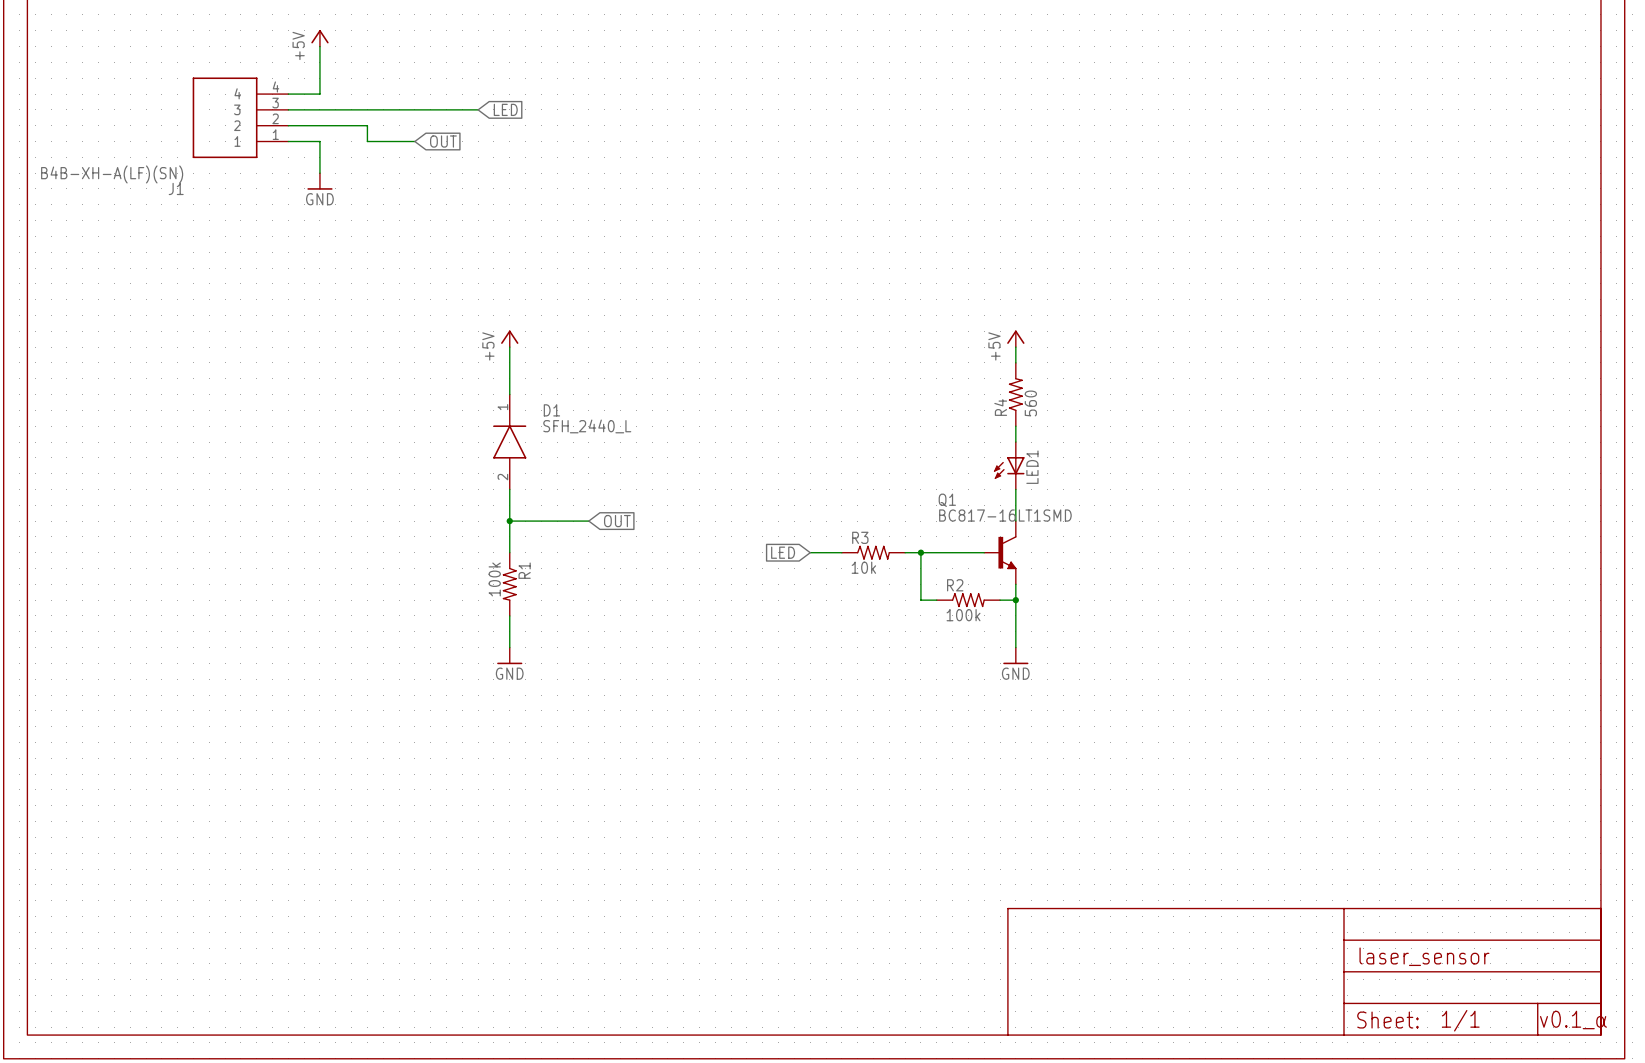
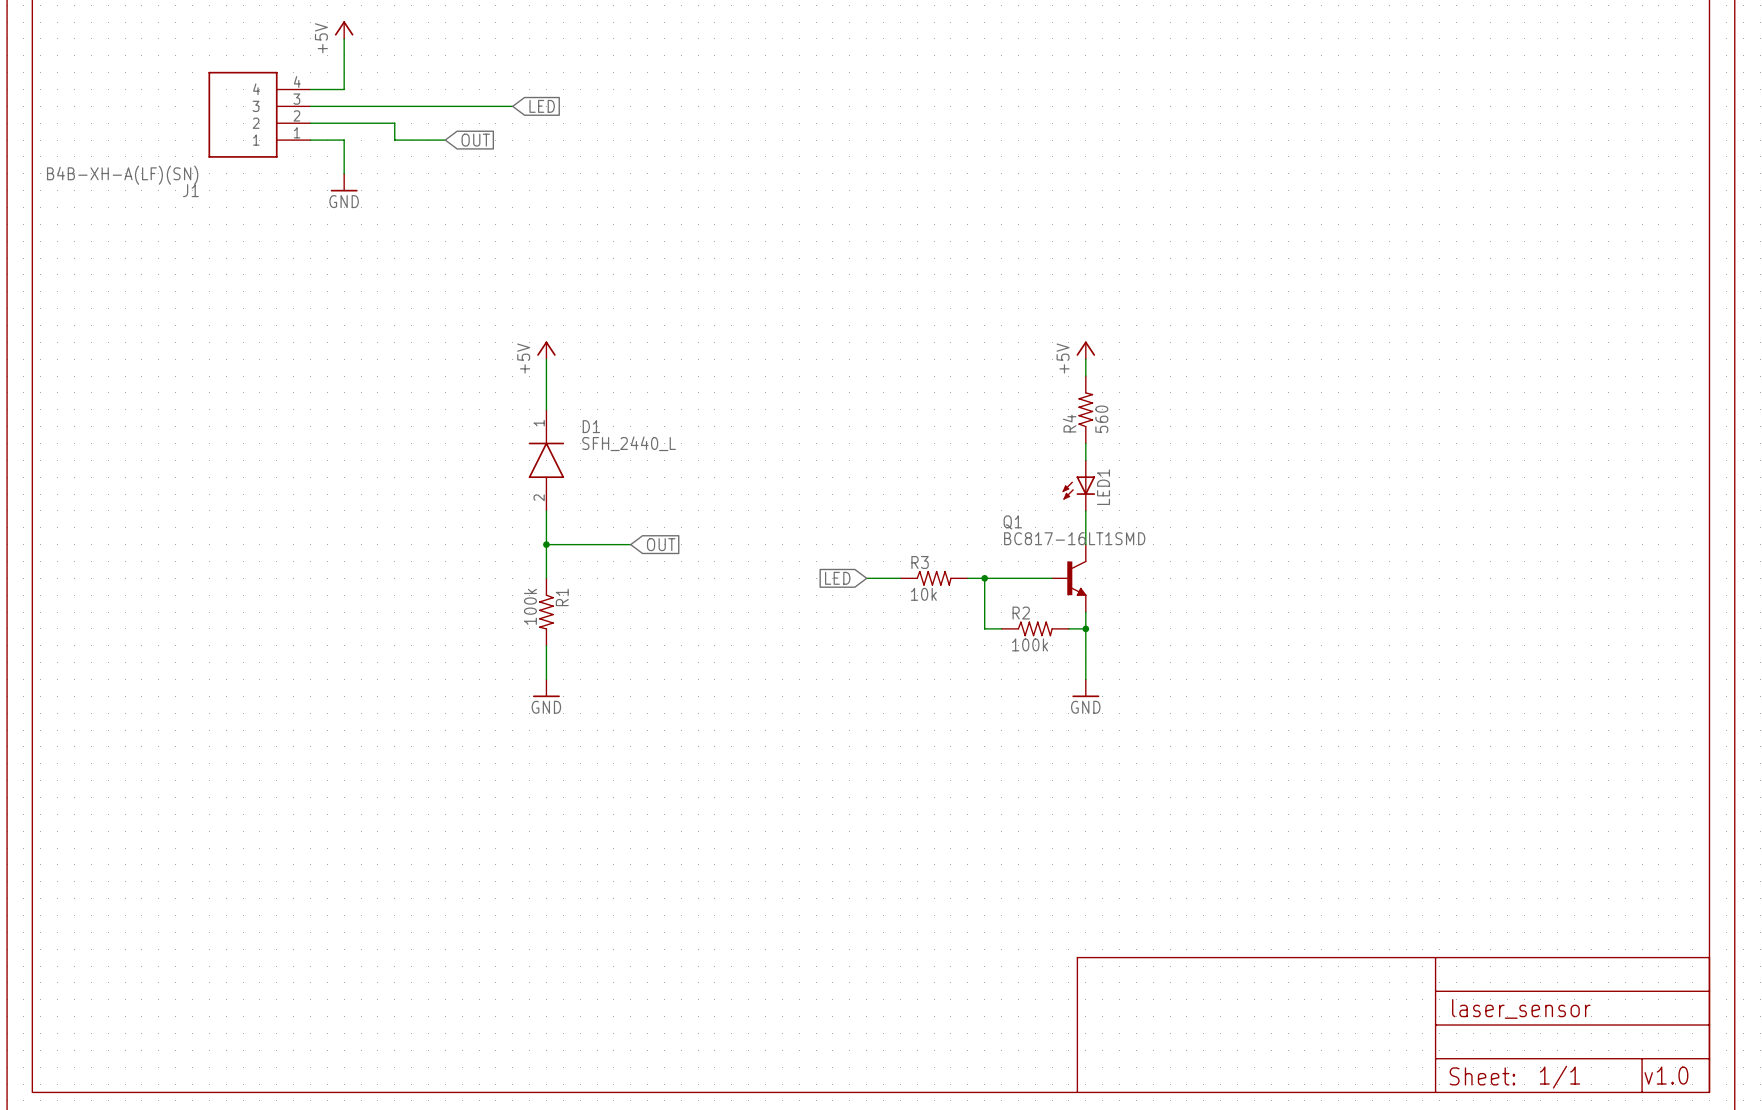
text: v0.1_α (1573, 1020) -> v1.0 (1666, 1075)

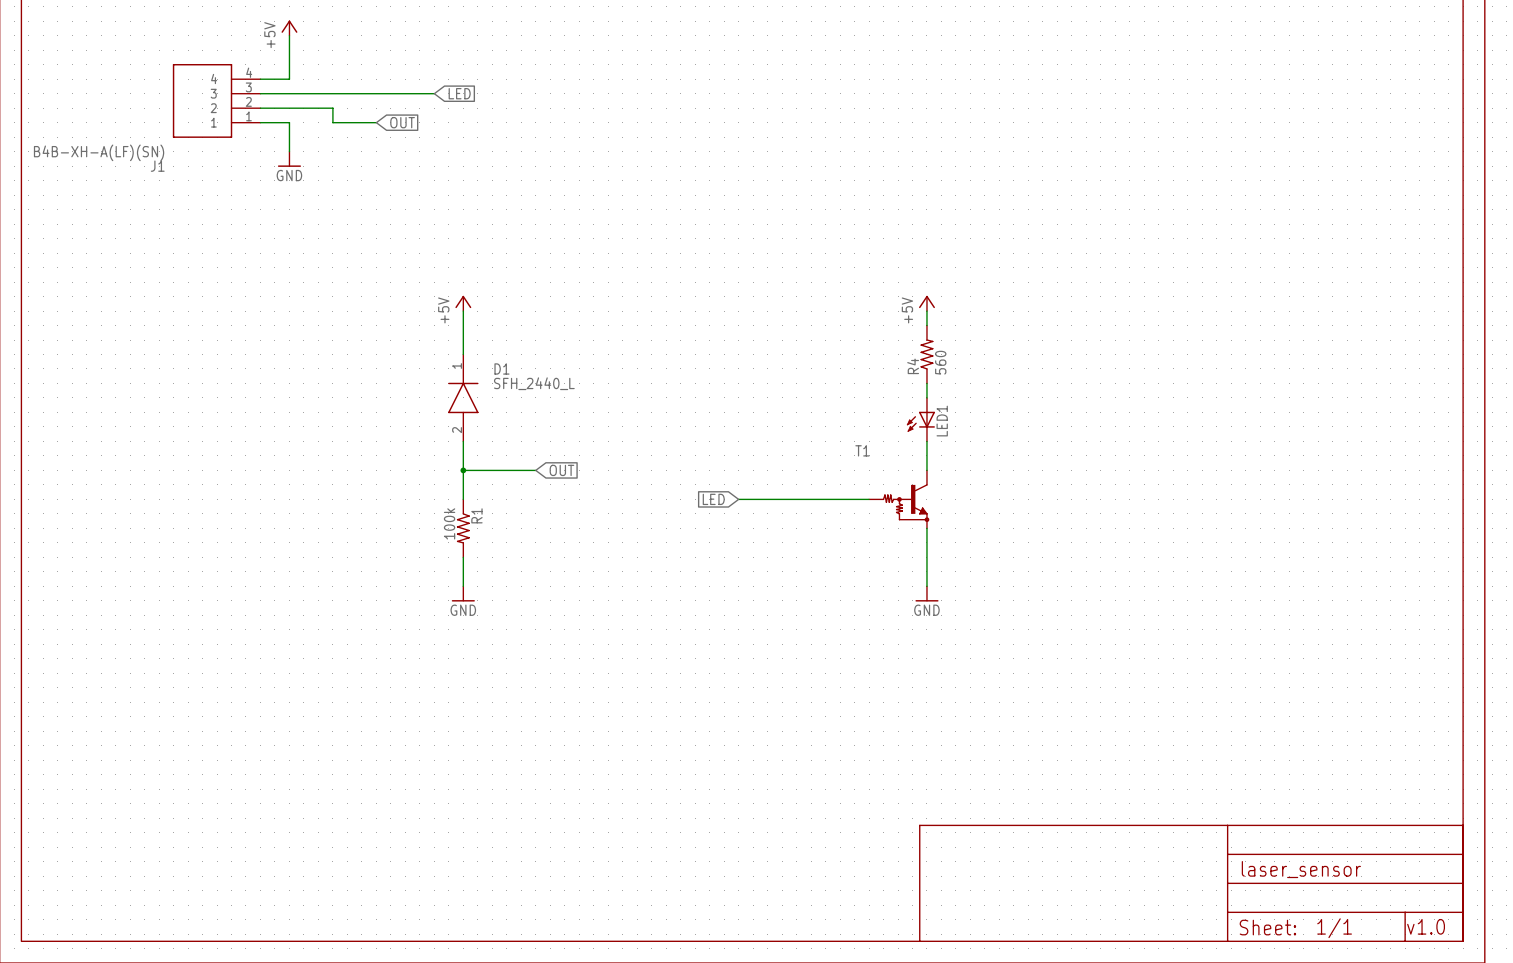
R3: 10k (934, 578) -> none
wire: (984, 578) (984, 628) (1001, 628) -> none
junction: (984, 578) -> none
T1: none -> (899, 499)
Q1: BC817-16LT1SMD (1069, 578) -> none
R2: 100k (1035, 628) -> none
wire: (1068, 628) (1085, 628) -> none
junction: (1085, 628) -> none

